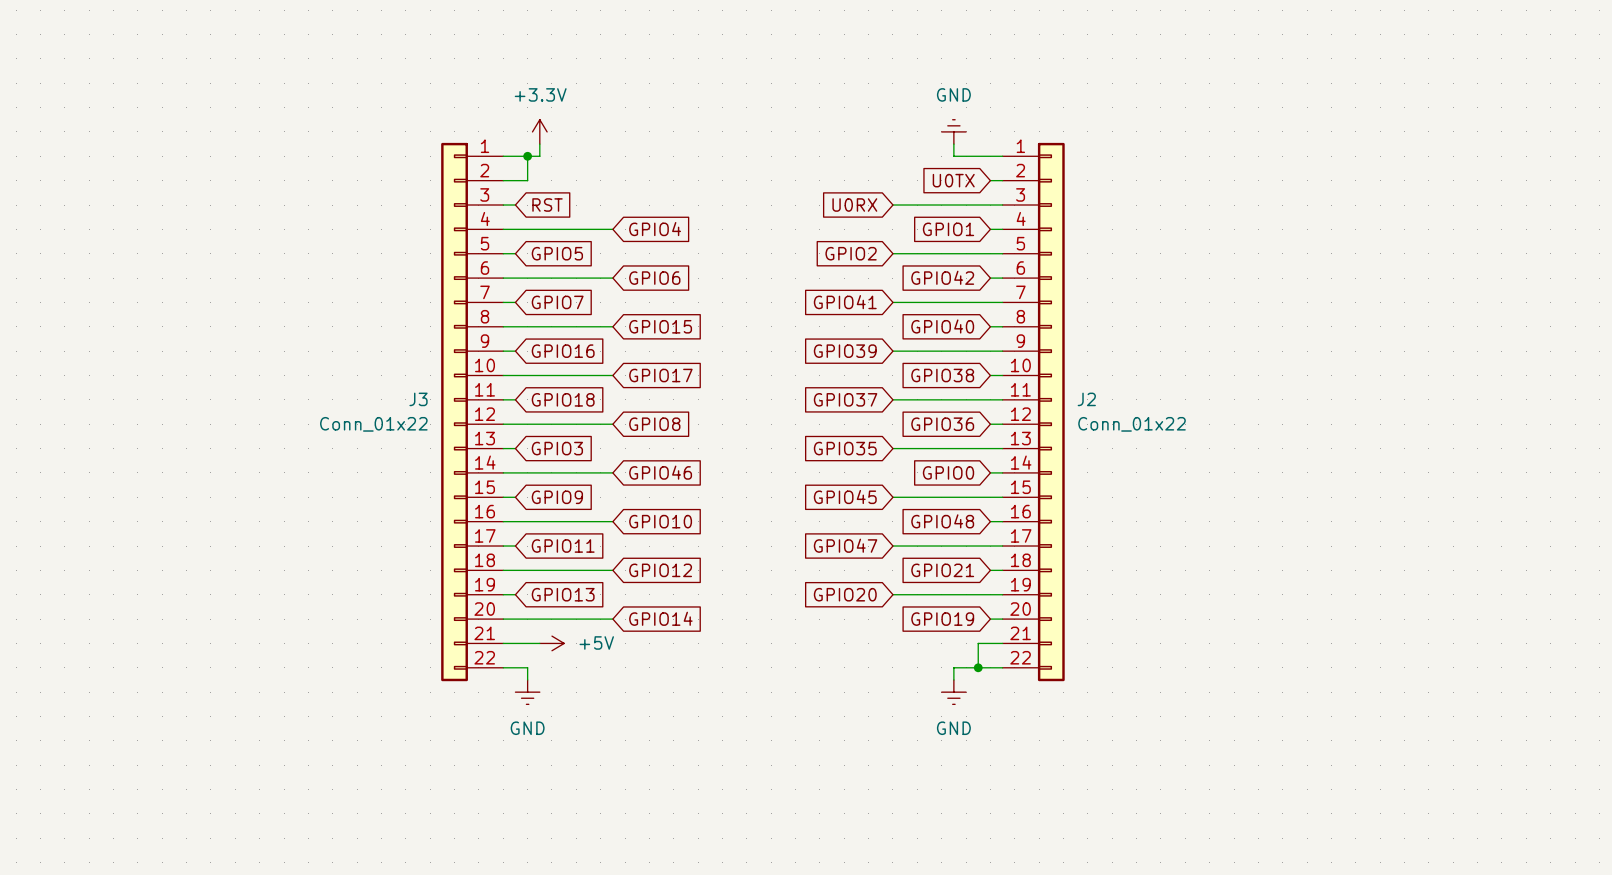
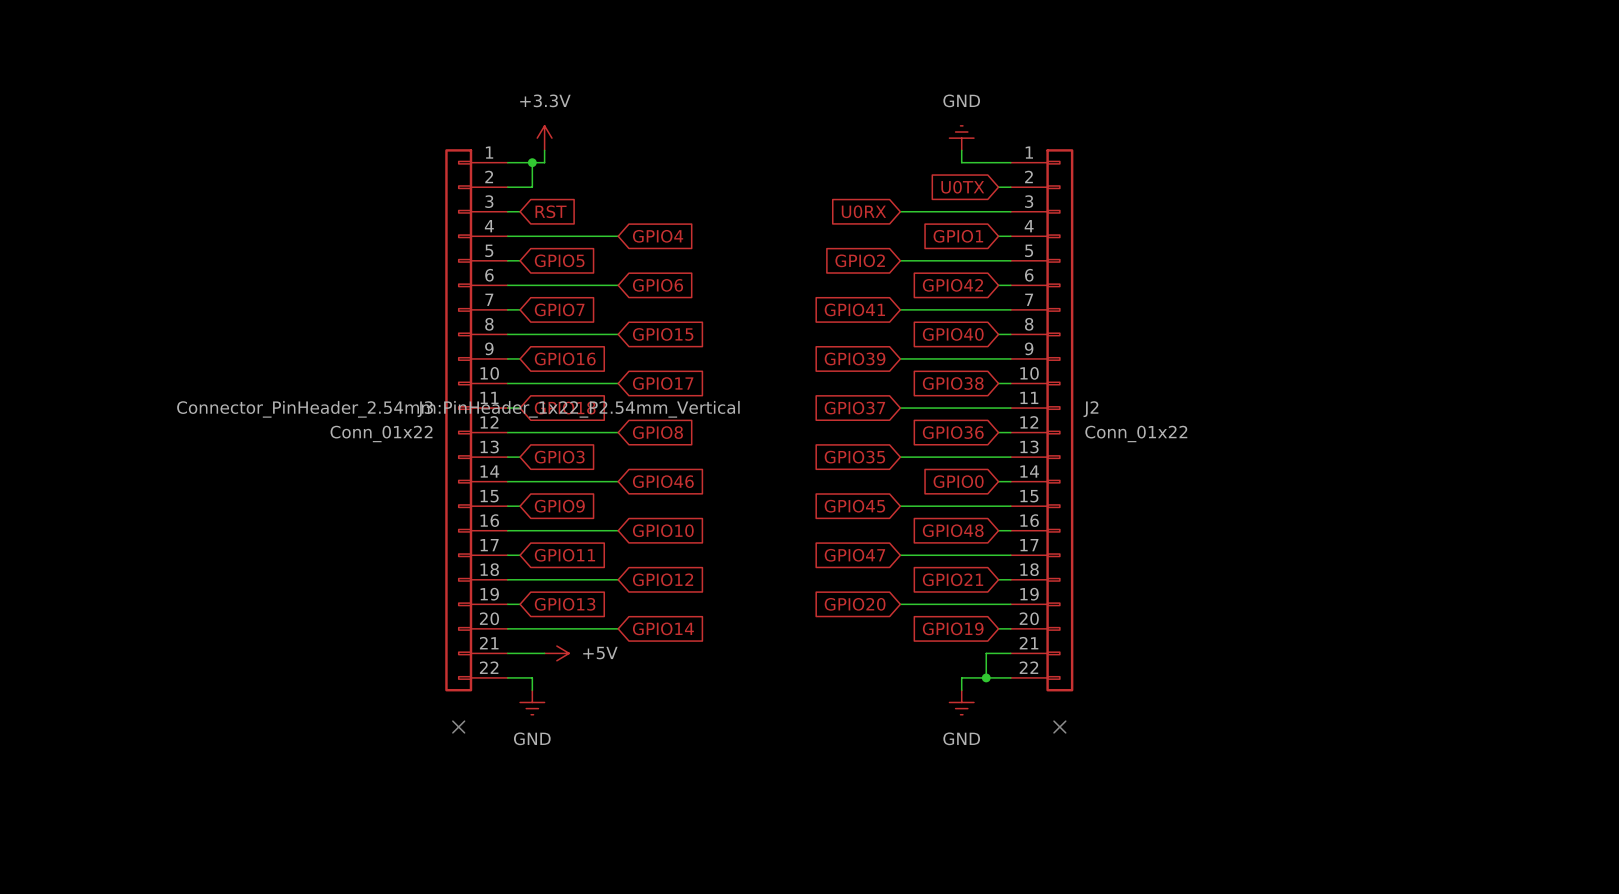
J3 text: none -> Connector_PinHeader_2.54mm:PinHeader_1x22_P2.54mm_Vertical (458, 409)
no-connect mark: none -> (458, 727)
no-connect mark: none -> (1059, 727)

